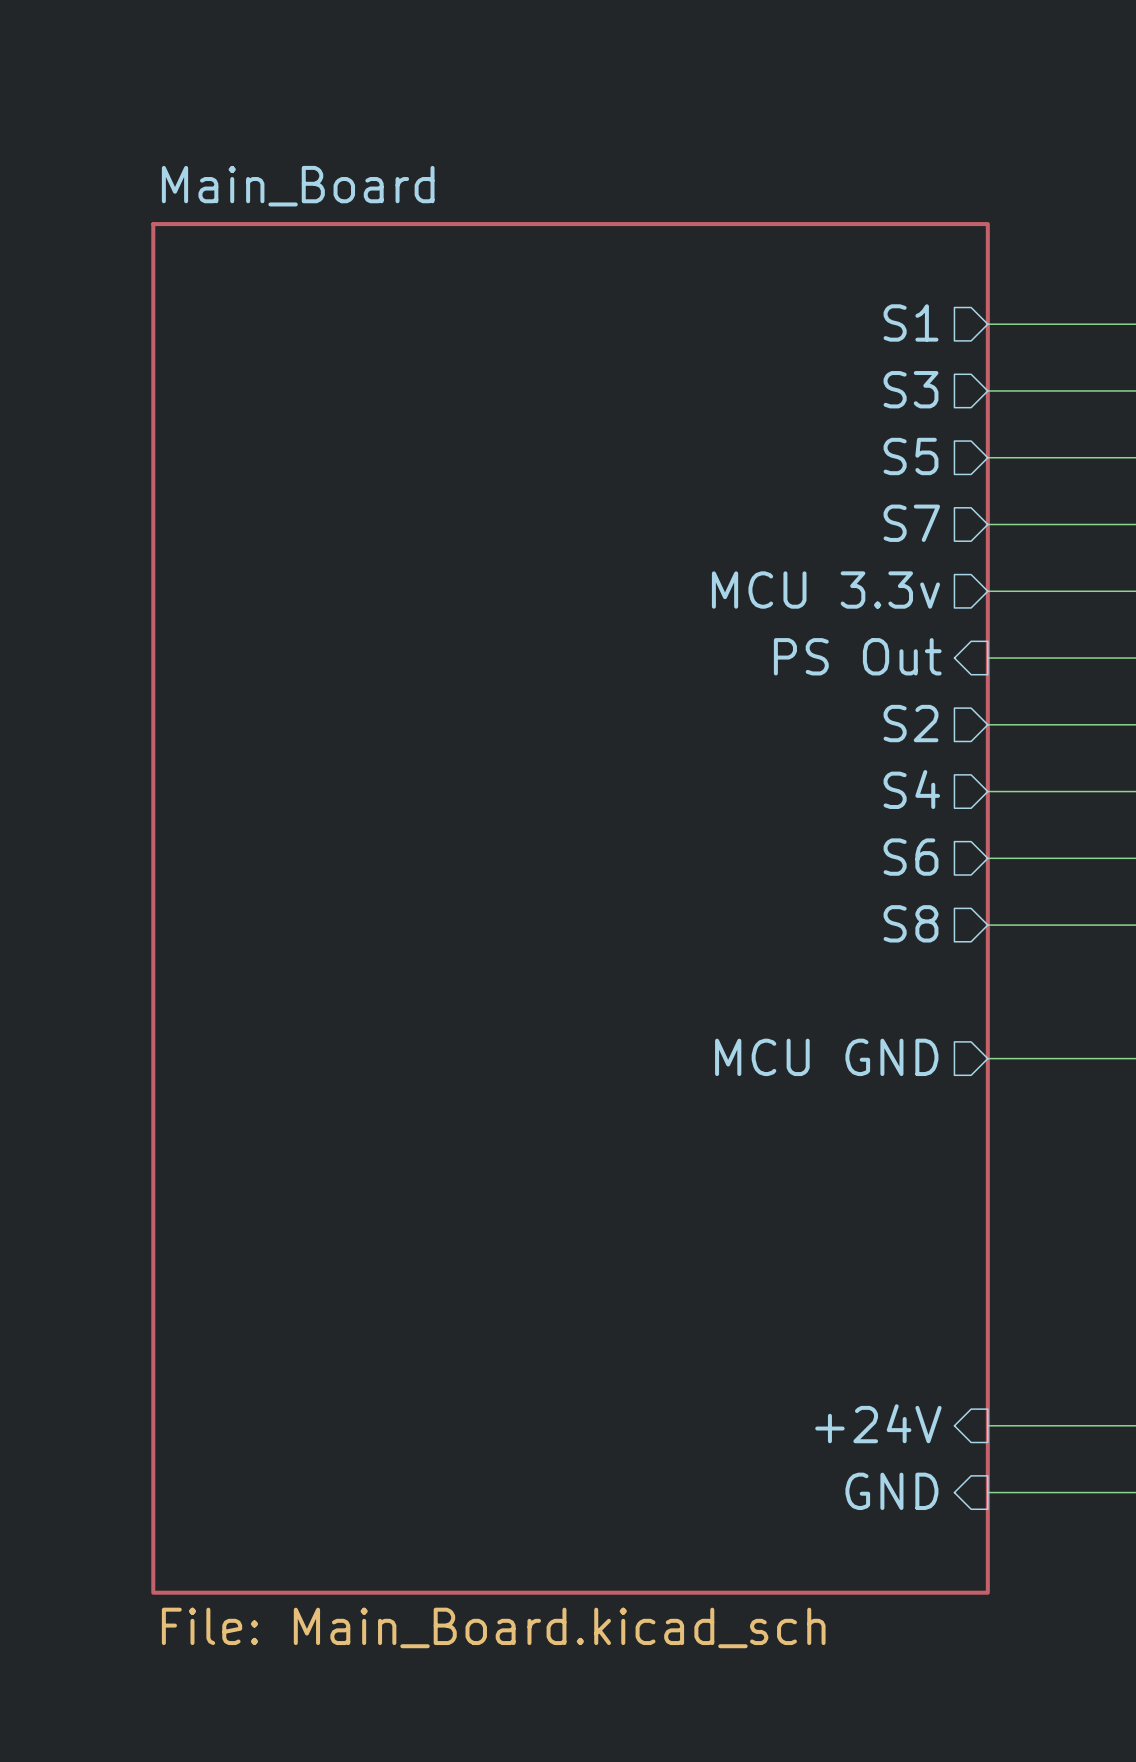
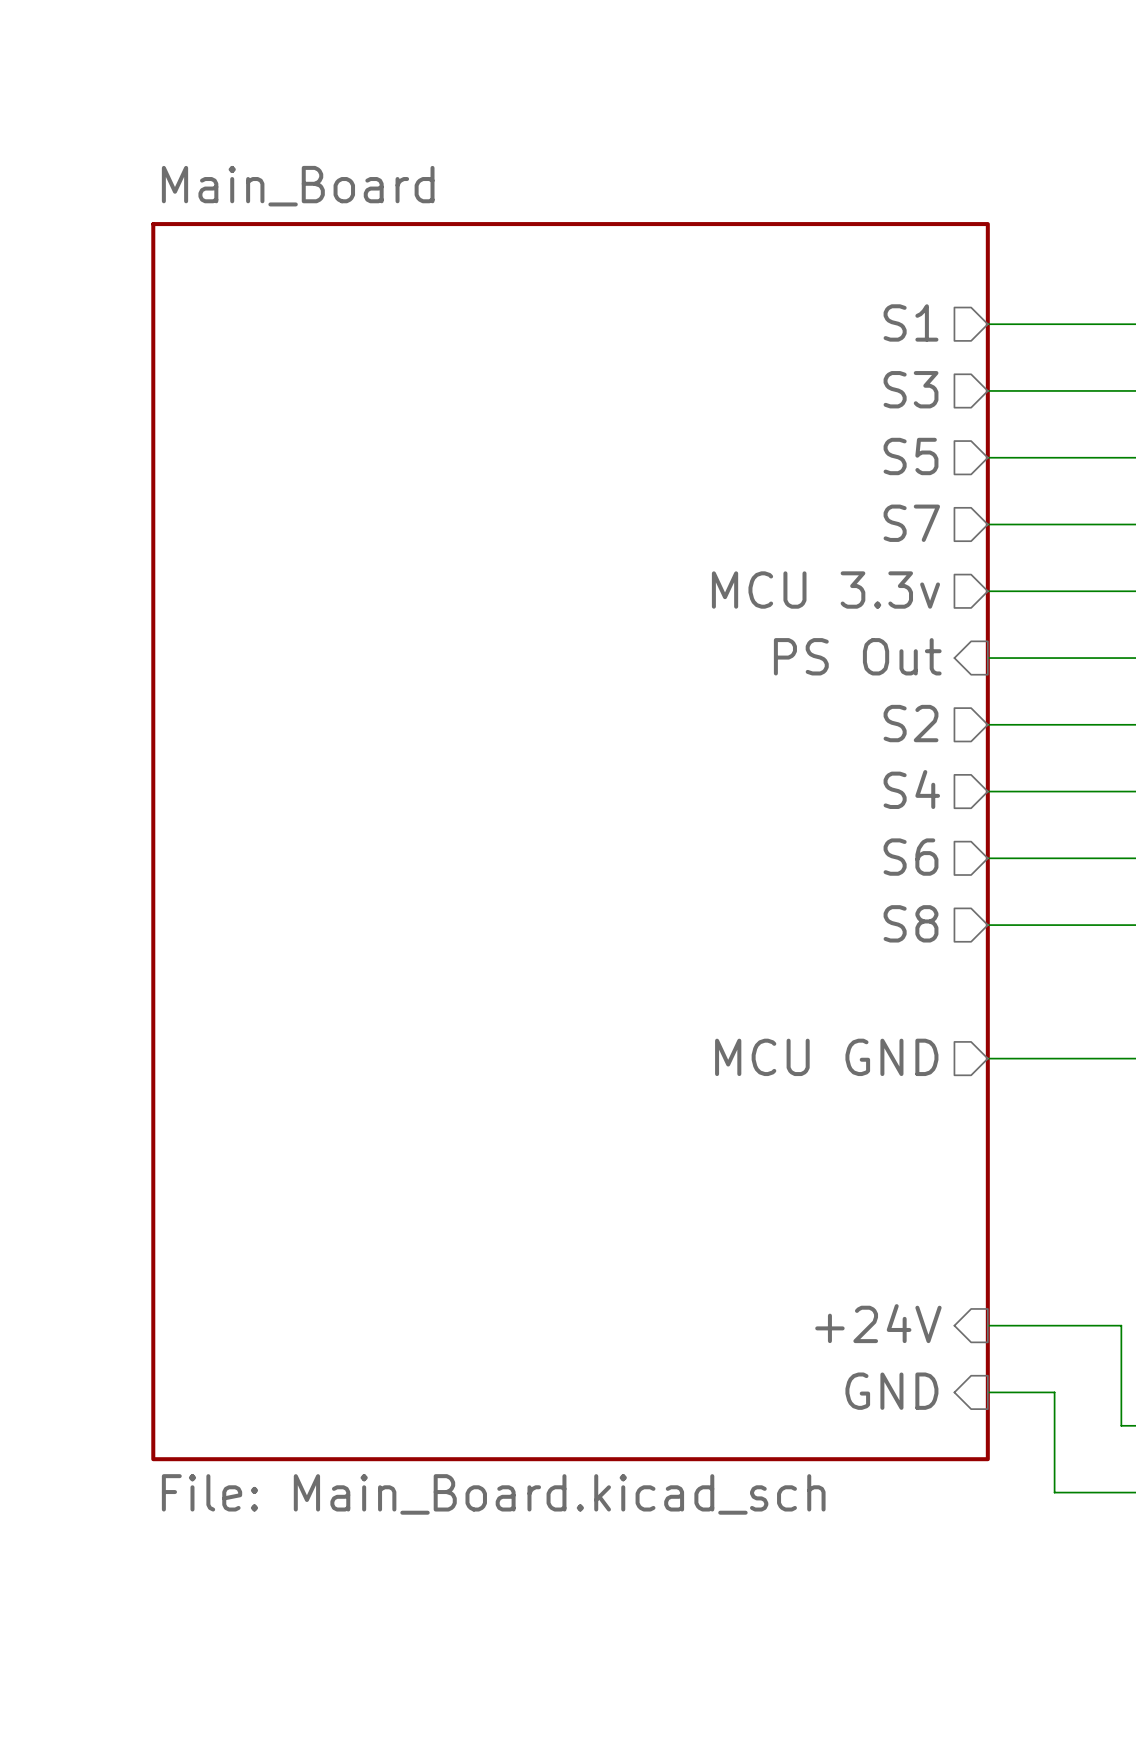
sheet Main_Board: none -> File: Main_Board.kicad_sch (570, 841)
sheet Main_Board: File: Main_Board.kicad_sch (570, 908) -> none
sheet pin position: +24V (878, 1423) -> +24V (878, 1323)
wire: (987, 1425) (1121, 1425) -> (987, 1325) (1121, 1325) (1121, 1425)
sheet pin position: GND (891, 1491) -> GND (891, 1391)
wire: (987, 1492) (1054, 1492) -> (987, 1392) (1054, 1392) (1054, 1492)

